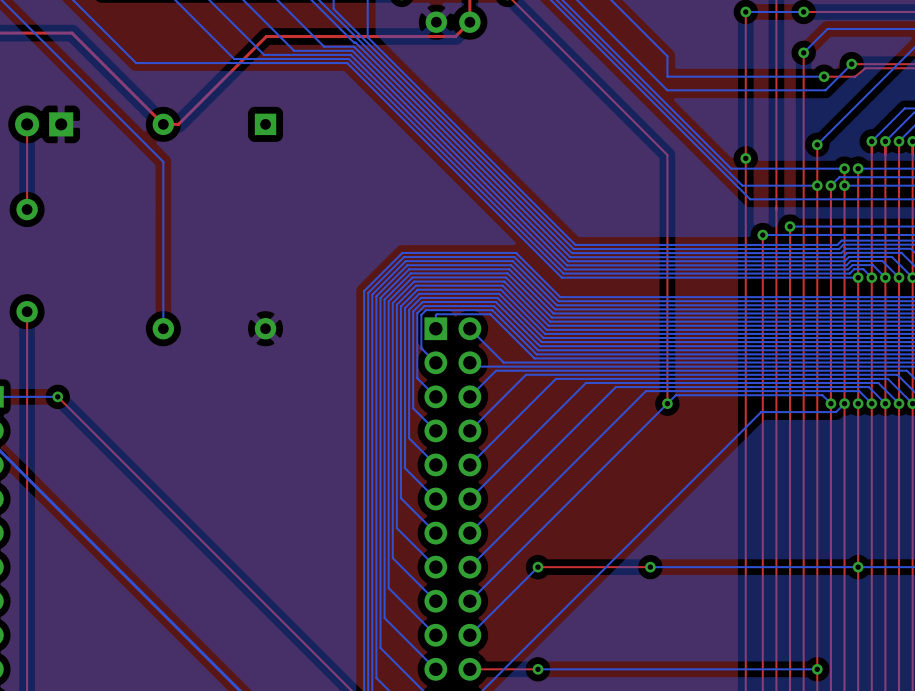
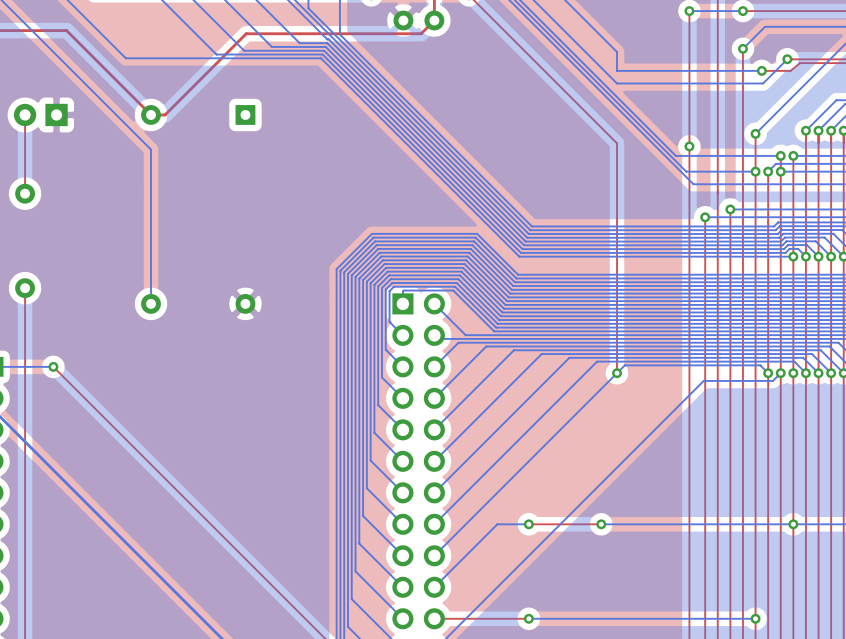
via position: (538, 567) -> (528, 524)
top track: (572, 567) (538, 567) -> (528, 618) (497, 618)
via position: (538, 669) -> (528, 618)
bottom track: (572, 669) (538, 669) -> (528, 524) (497, 524)

